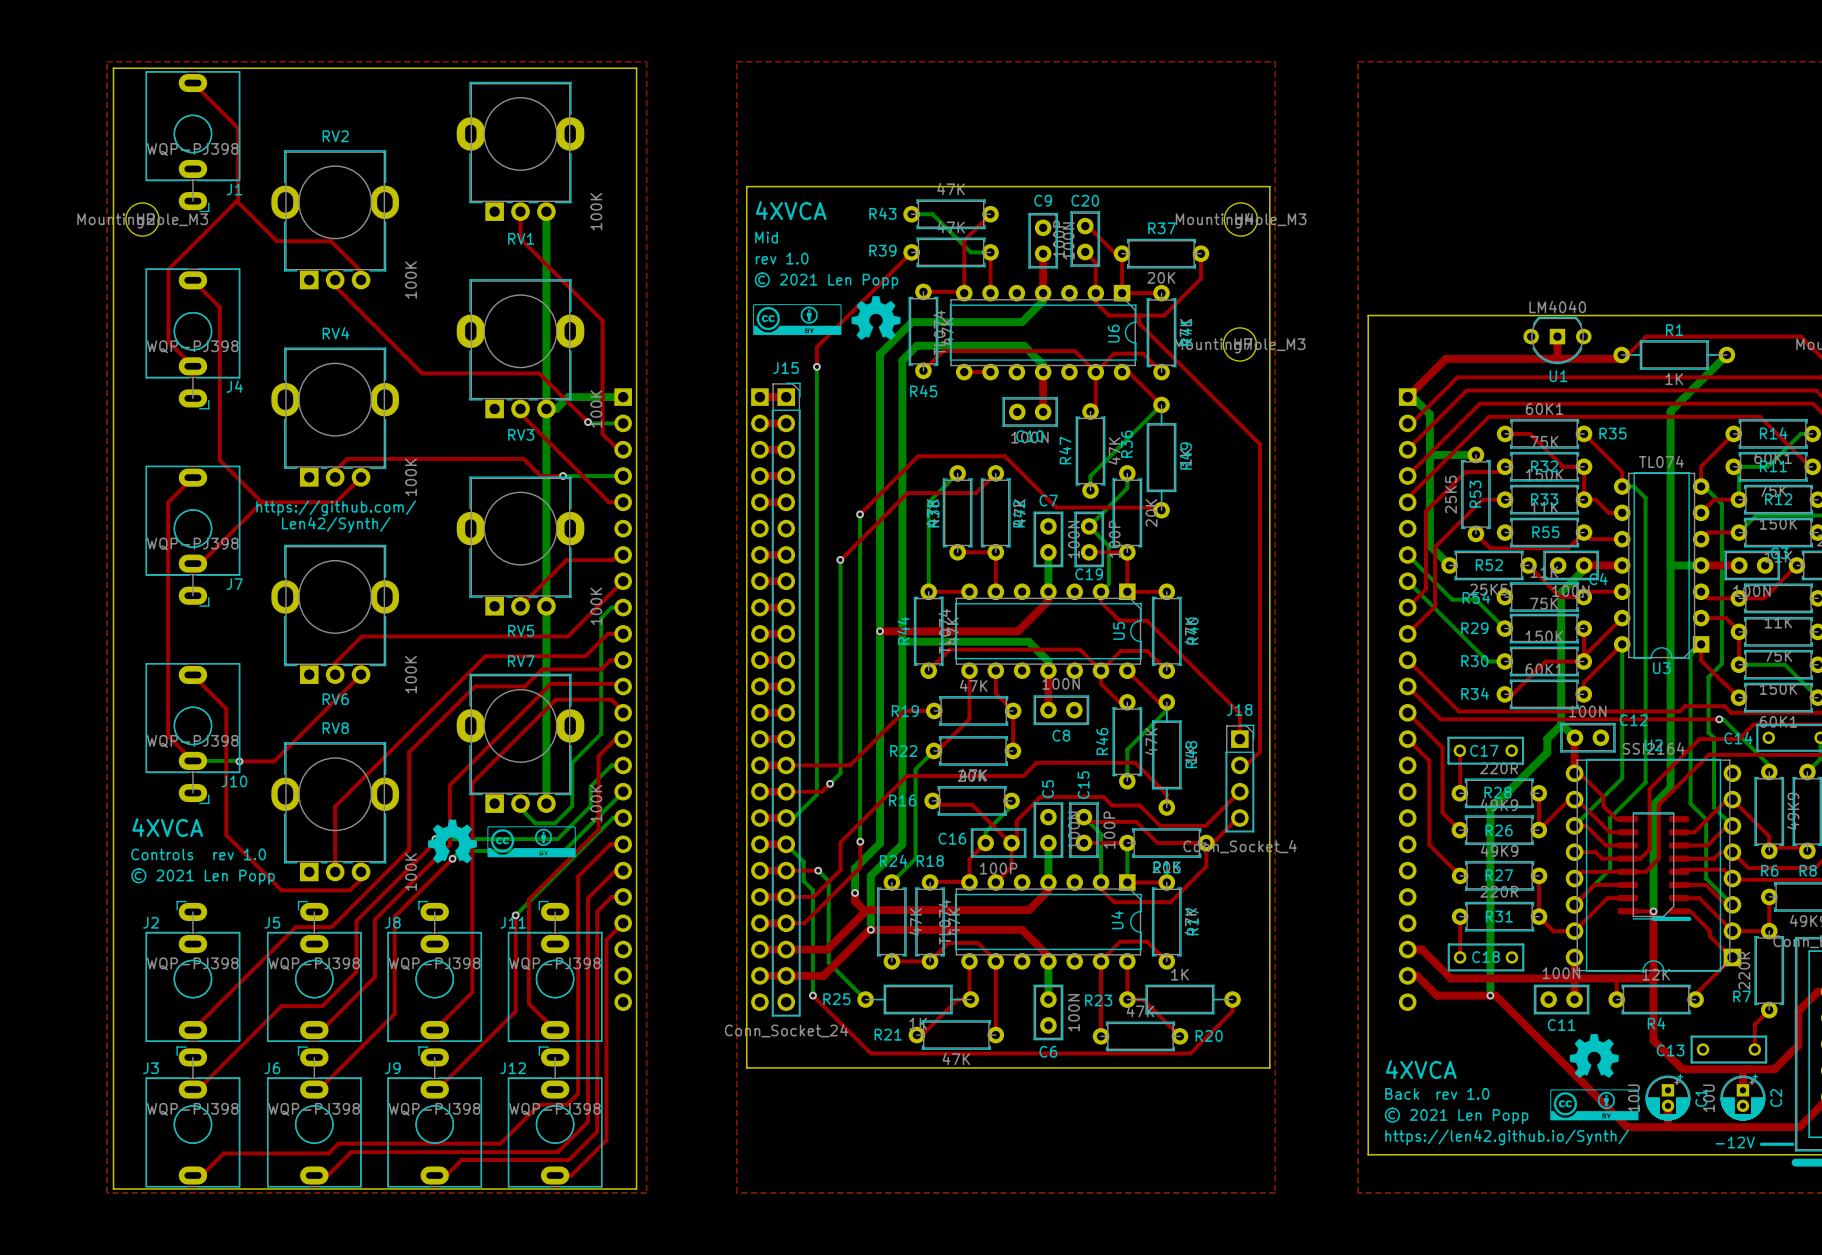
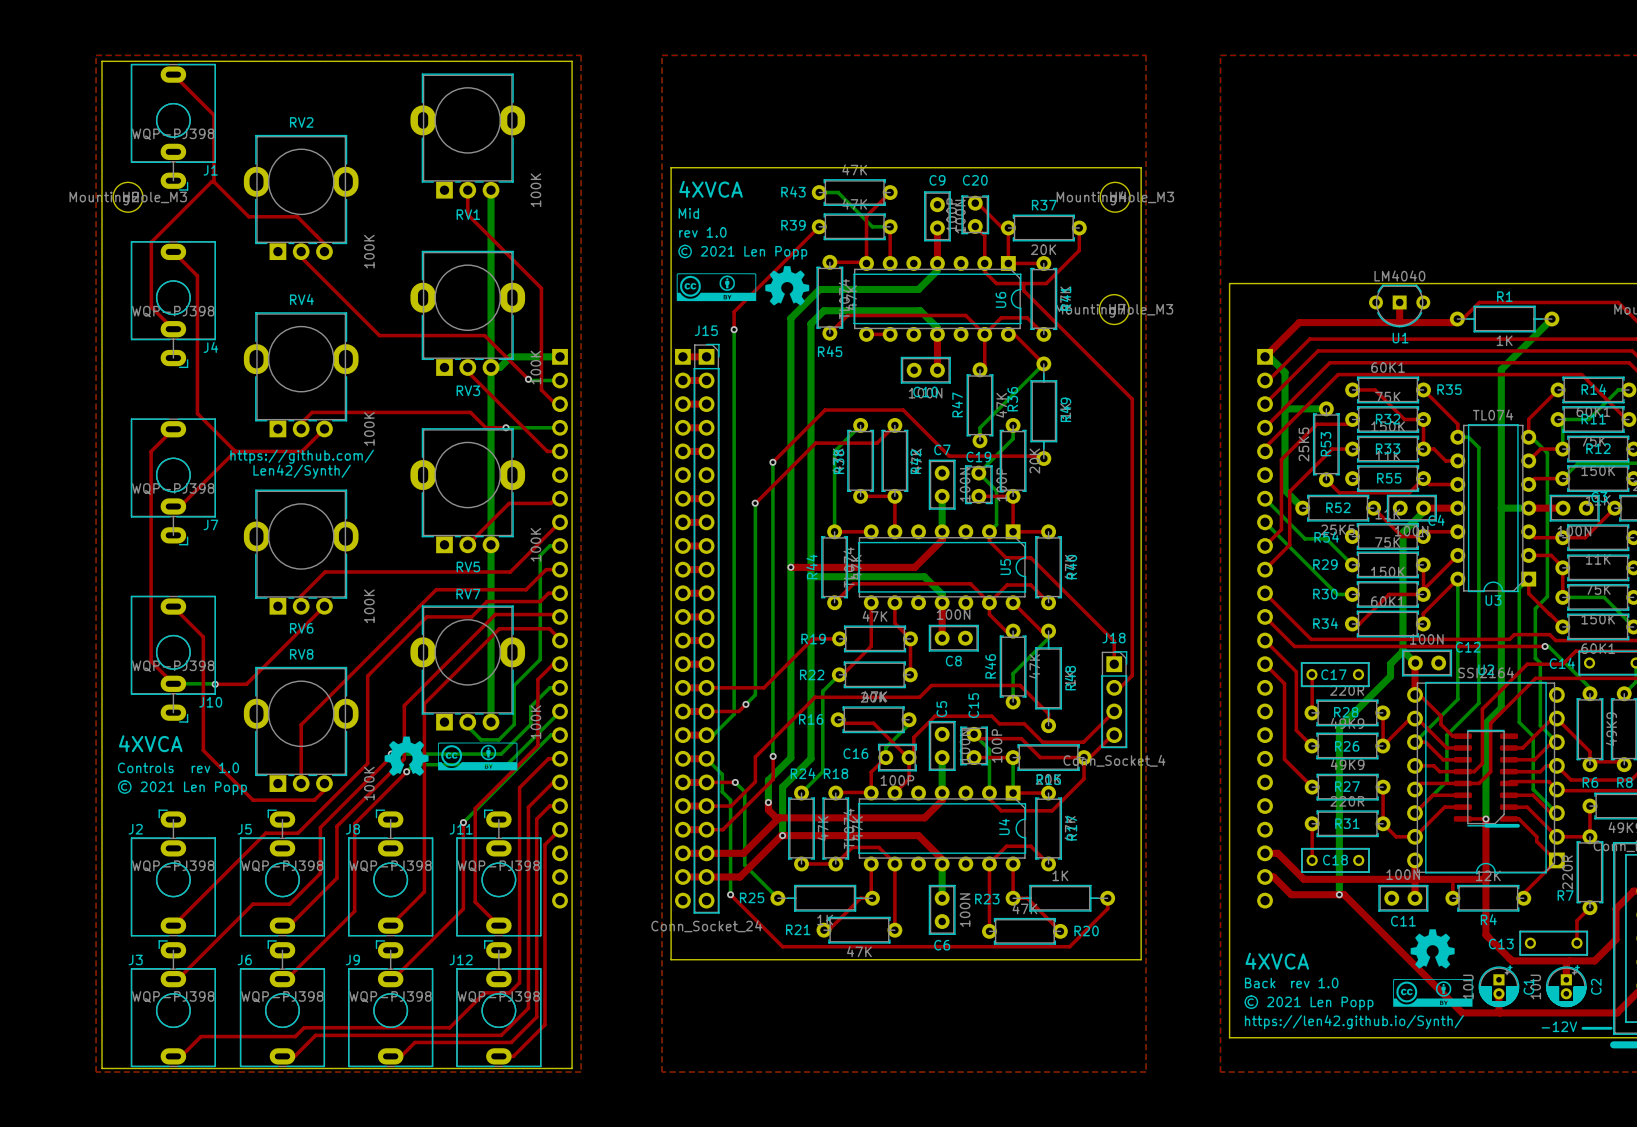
C20 footprint: [1070, 211, 1101, 267] -> [961, 195, 990, 235]
C19 footprint: [1074, 511, 1105, 568] -> [965, 465, 993, 505]
C19 name position: C19 (1089, 574) -> C19 (978, 456)
C15 footprint: [1069, 802, 1099, 858] -> [960, 726, 988, 766]
C16 footprint: [970, 828, 1027, 858] -> [878, 743, 917, 772]

